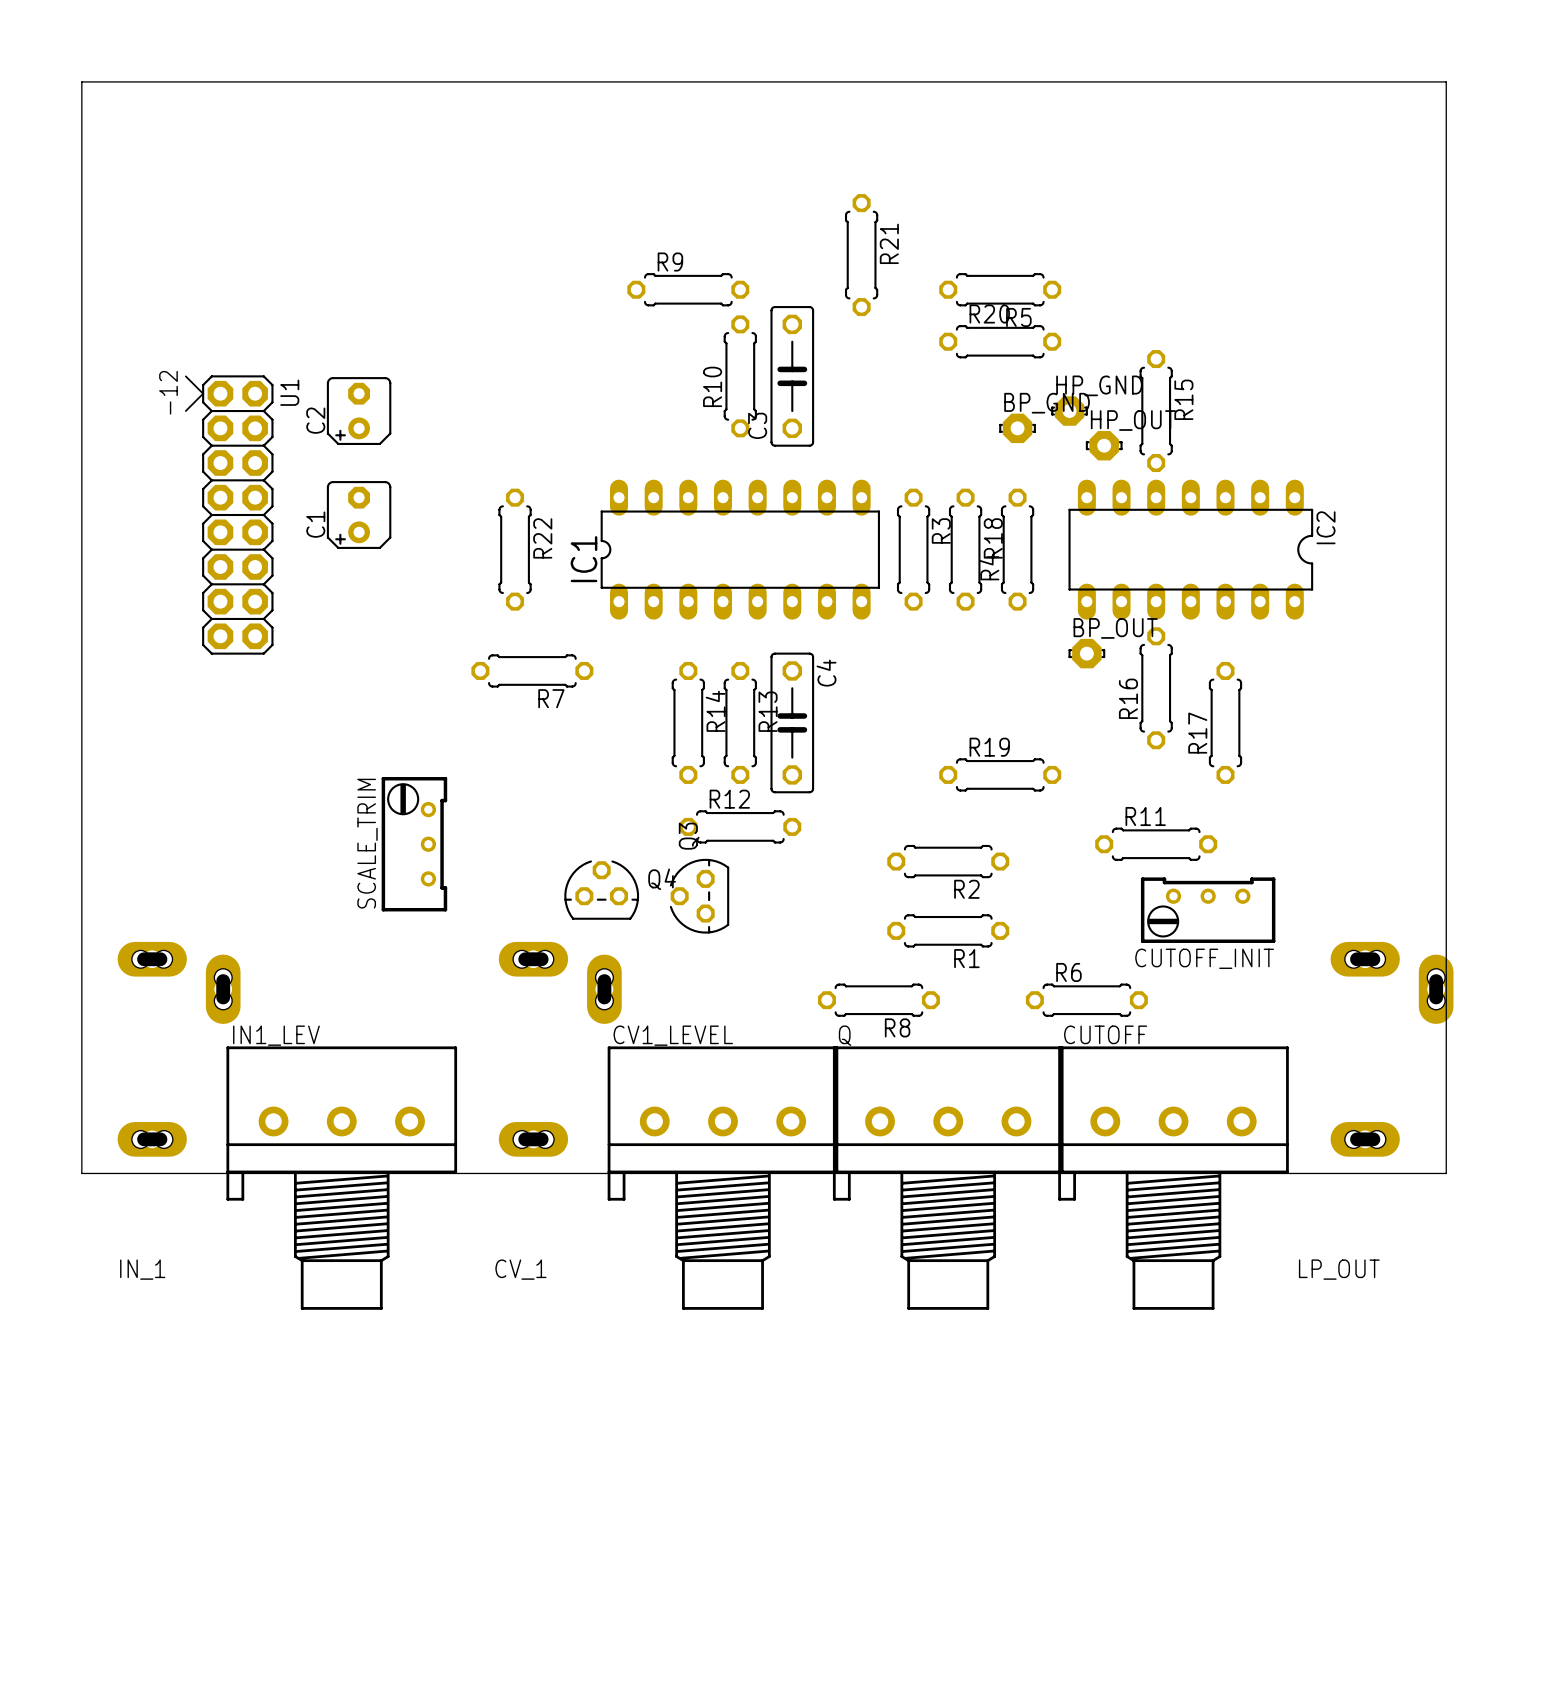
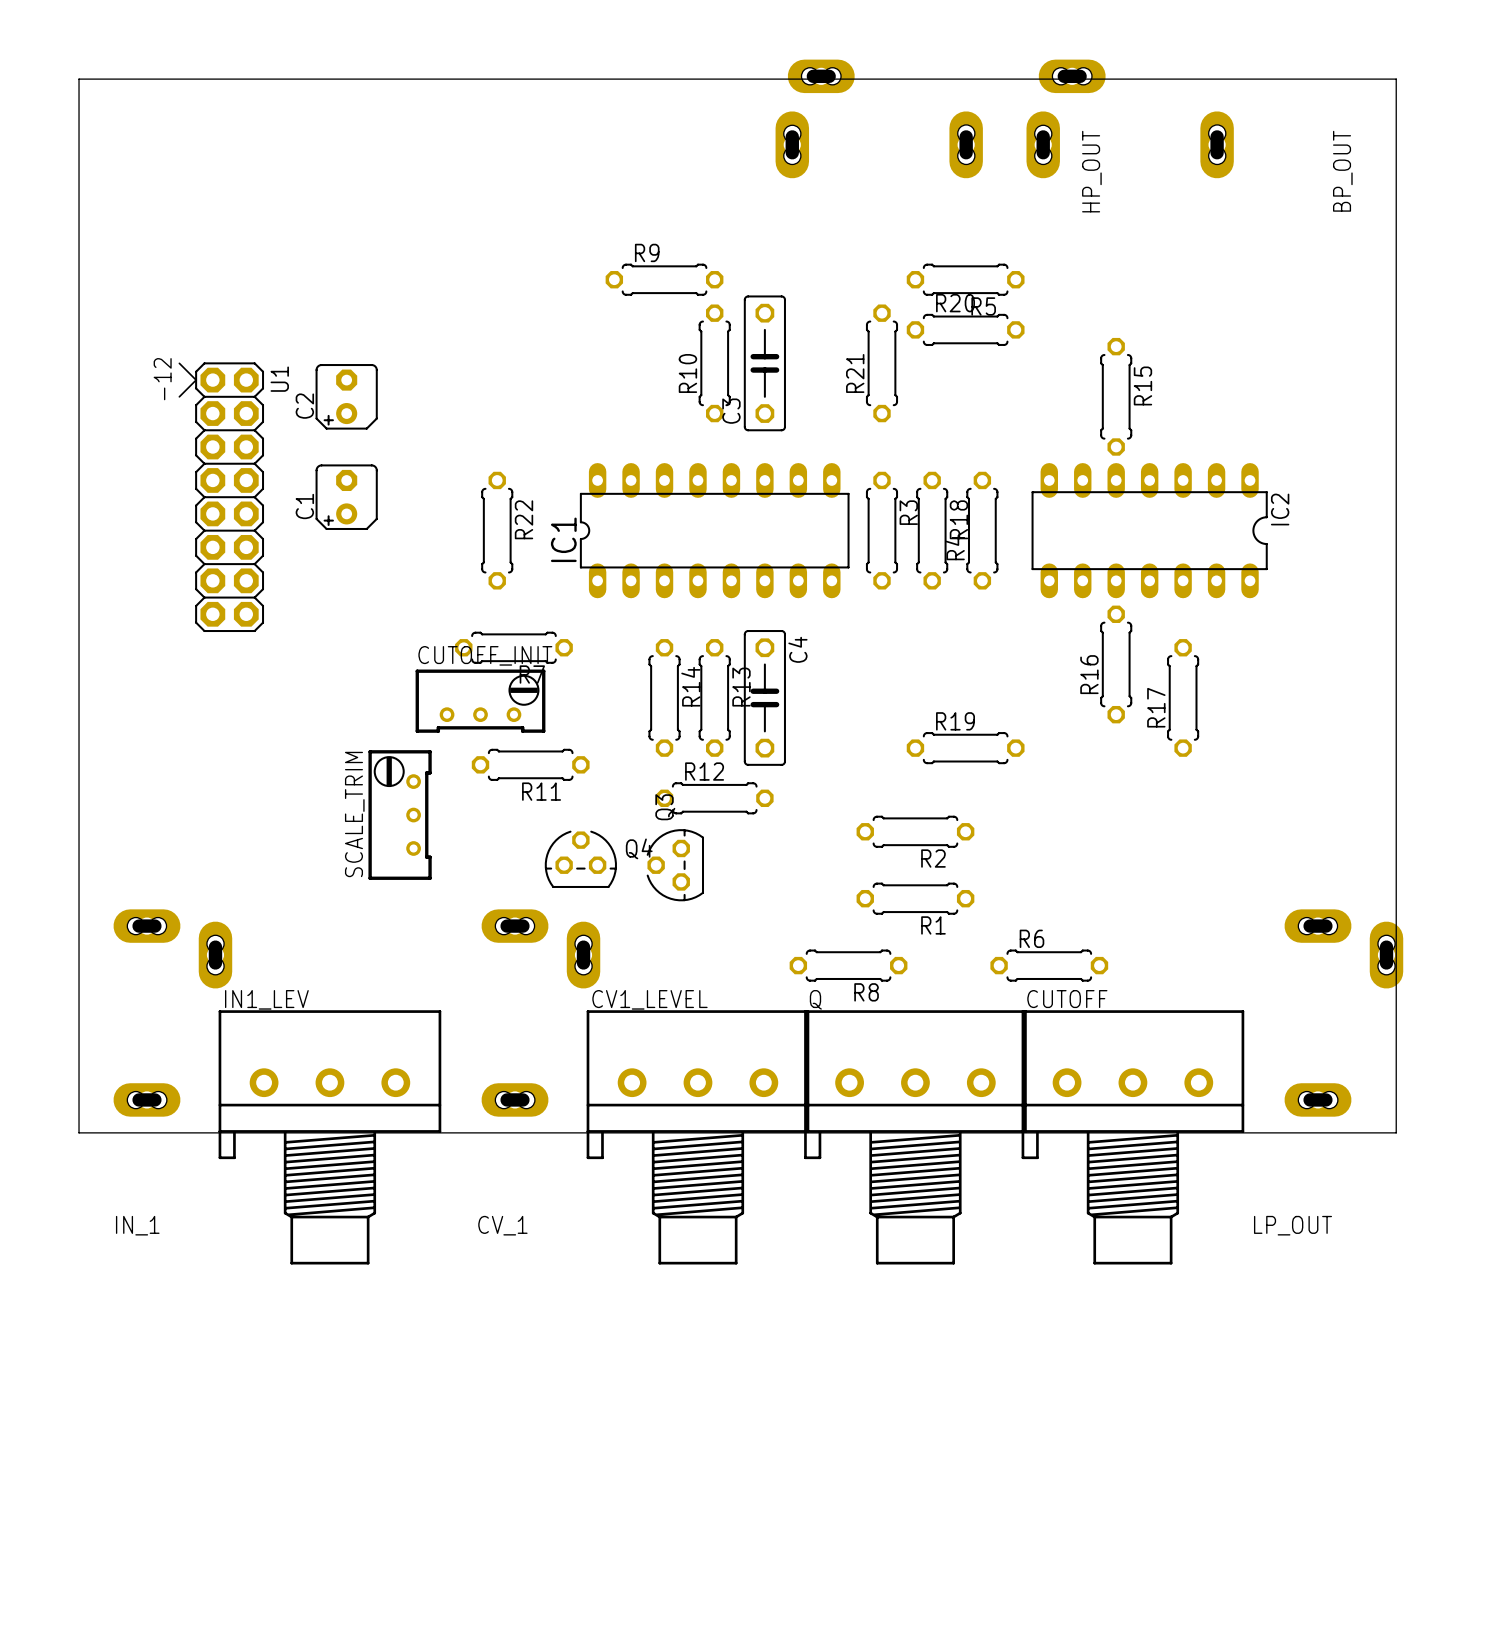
HP_OUT: none -> (879, 118)
BP_OUT: none -> (1130, 118)
R21 name position: R21 (889, 243) -> R21 (855, 373)
R21 position: (861, 255) -> (881, 363)
HP_GND: (1069, 411) -> none
BP_GND: (1017, 428) -> none
HP_OUT: (1104, 445) -> none
BP_OUT: (1086, 653) -> none
CUTOFF_INIT: none -> (480, 701)
R11 name position: R11 (1145, 816) -> R11 (541, 791)
R11 position: (1156, 844) -> (530, 764)
CUTOFF_INIT: (1208, 910) -> none

